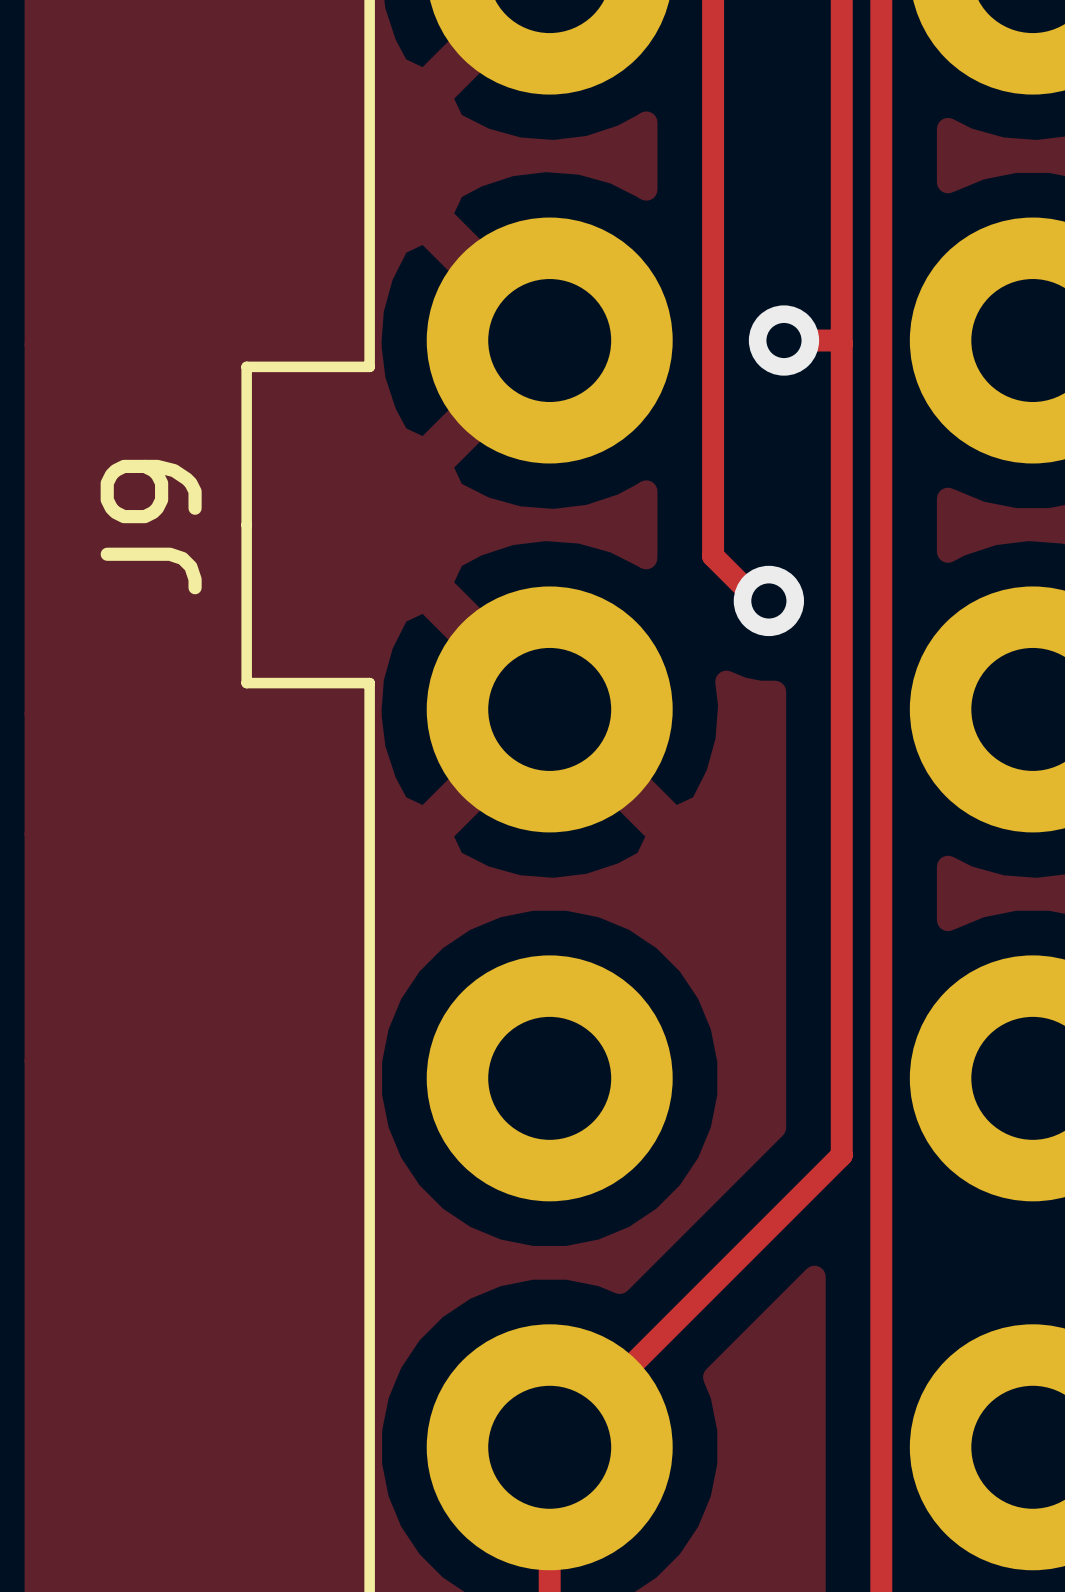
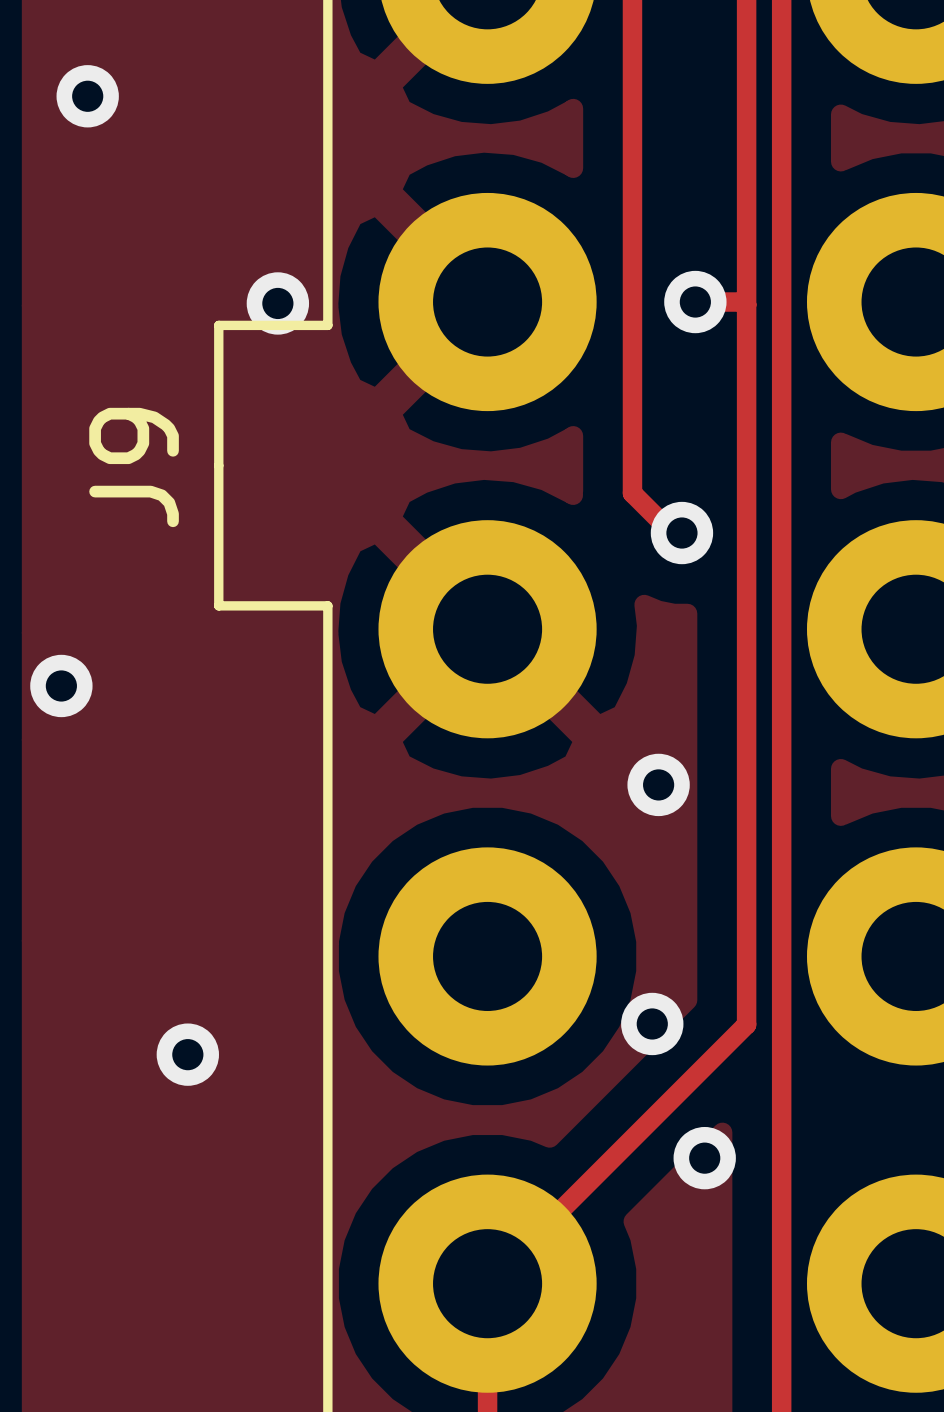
via: none -> (87, 96)
via: none -> (277, 303)
via: none -> (61, 685)
via: none -> (658, 784)
via: none -> (652, 1023)
via: none -> (187, 1054)
via: none -> (704, 1158)

